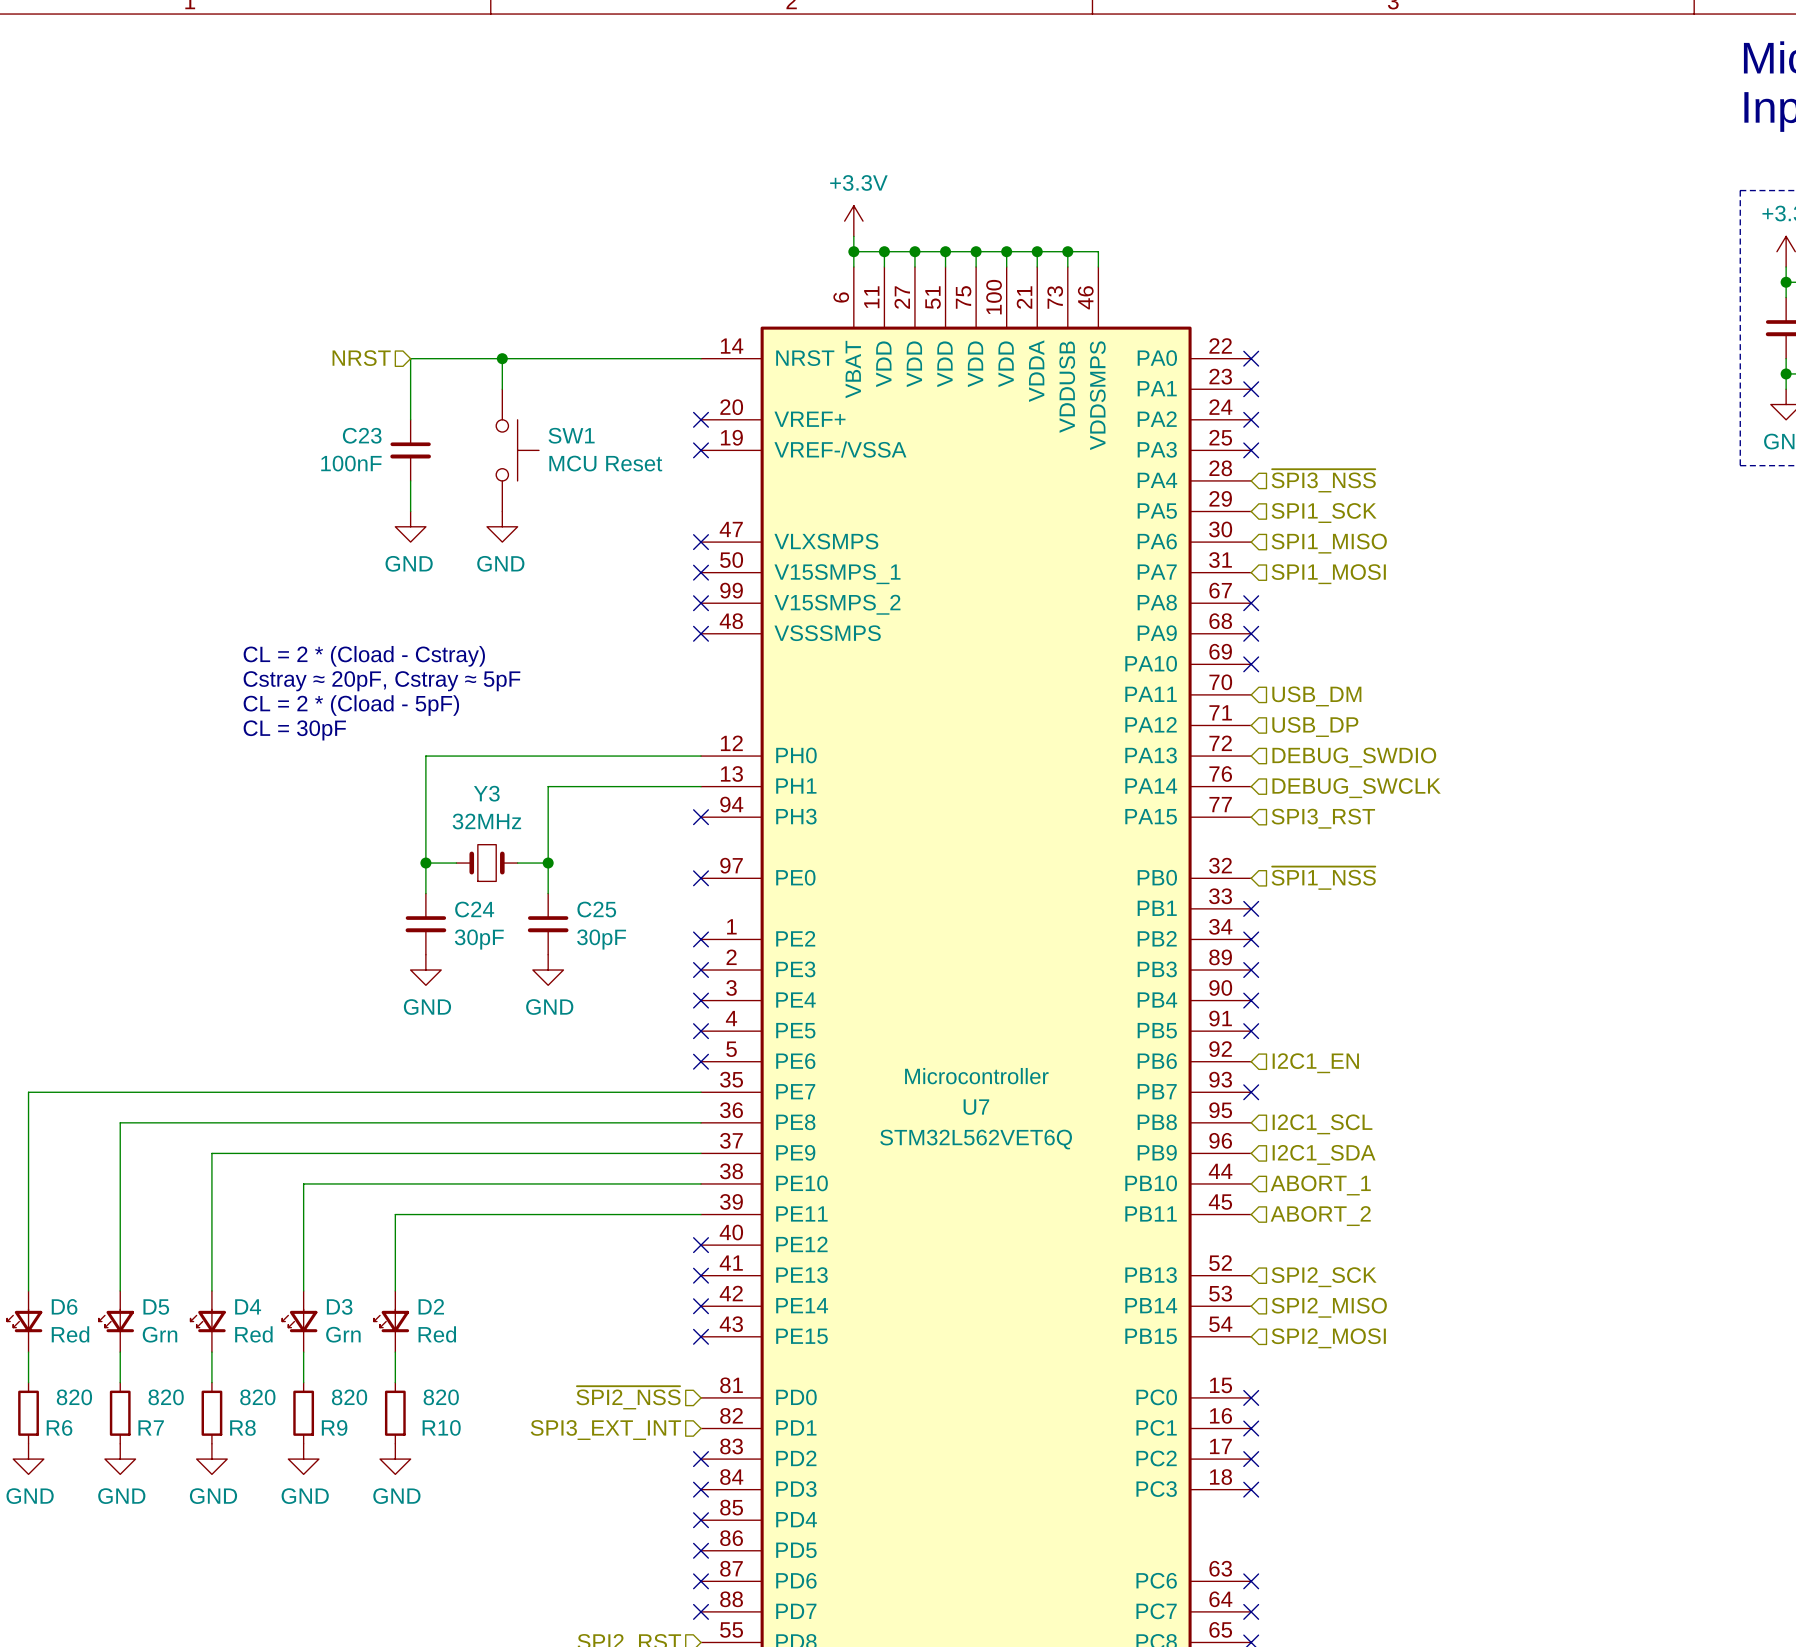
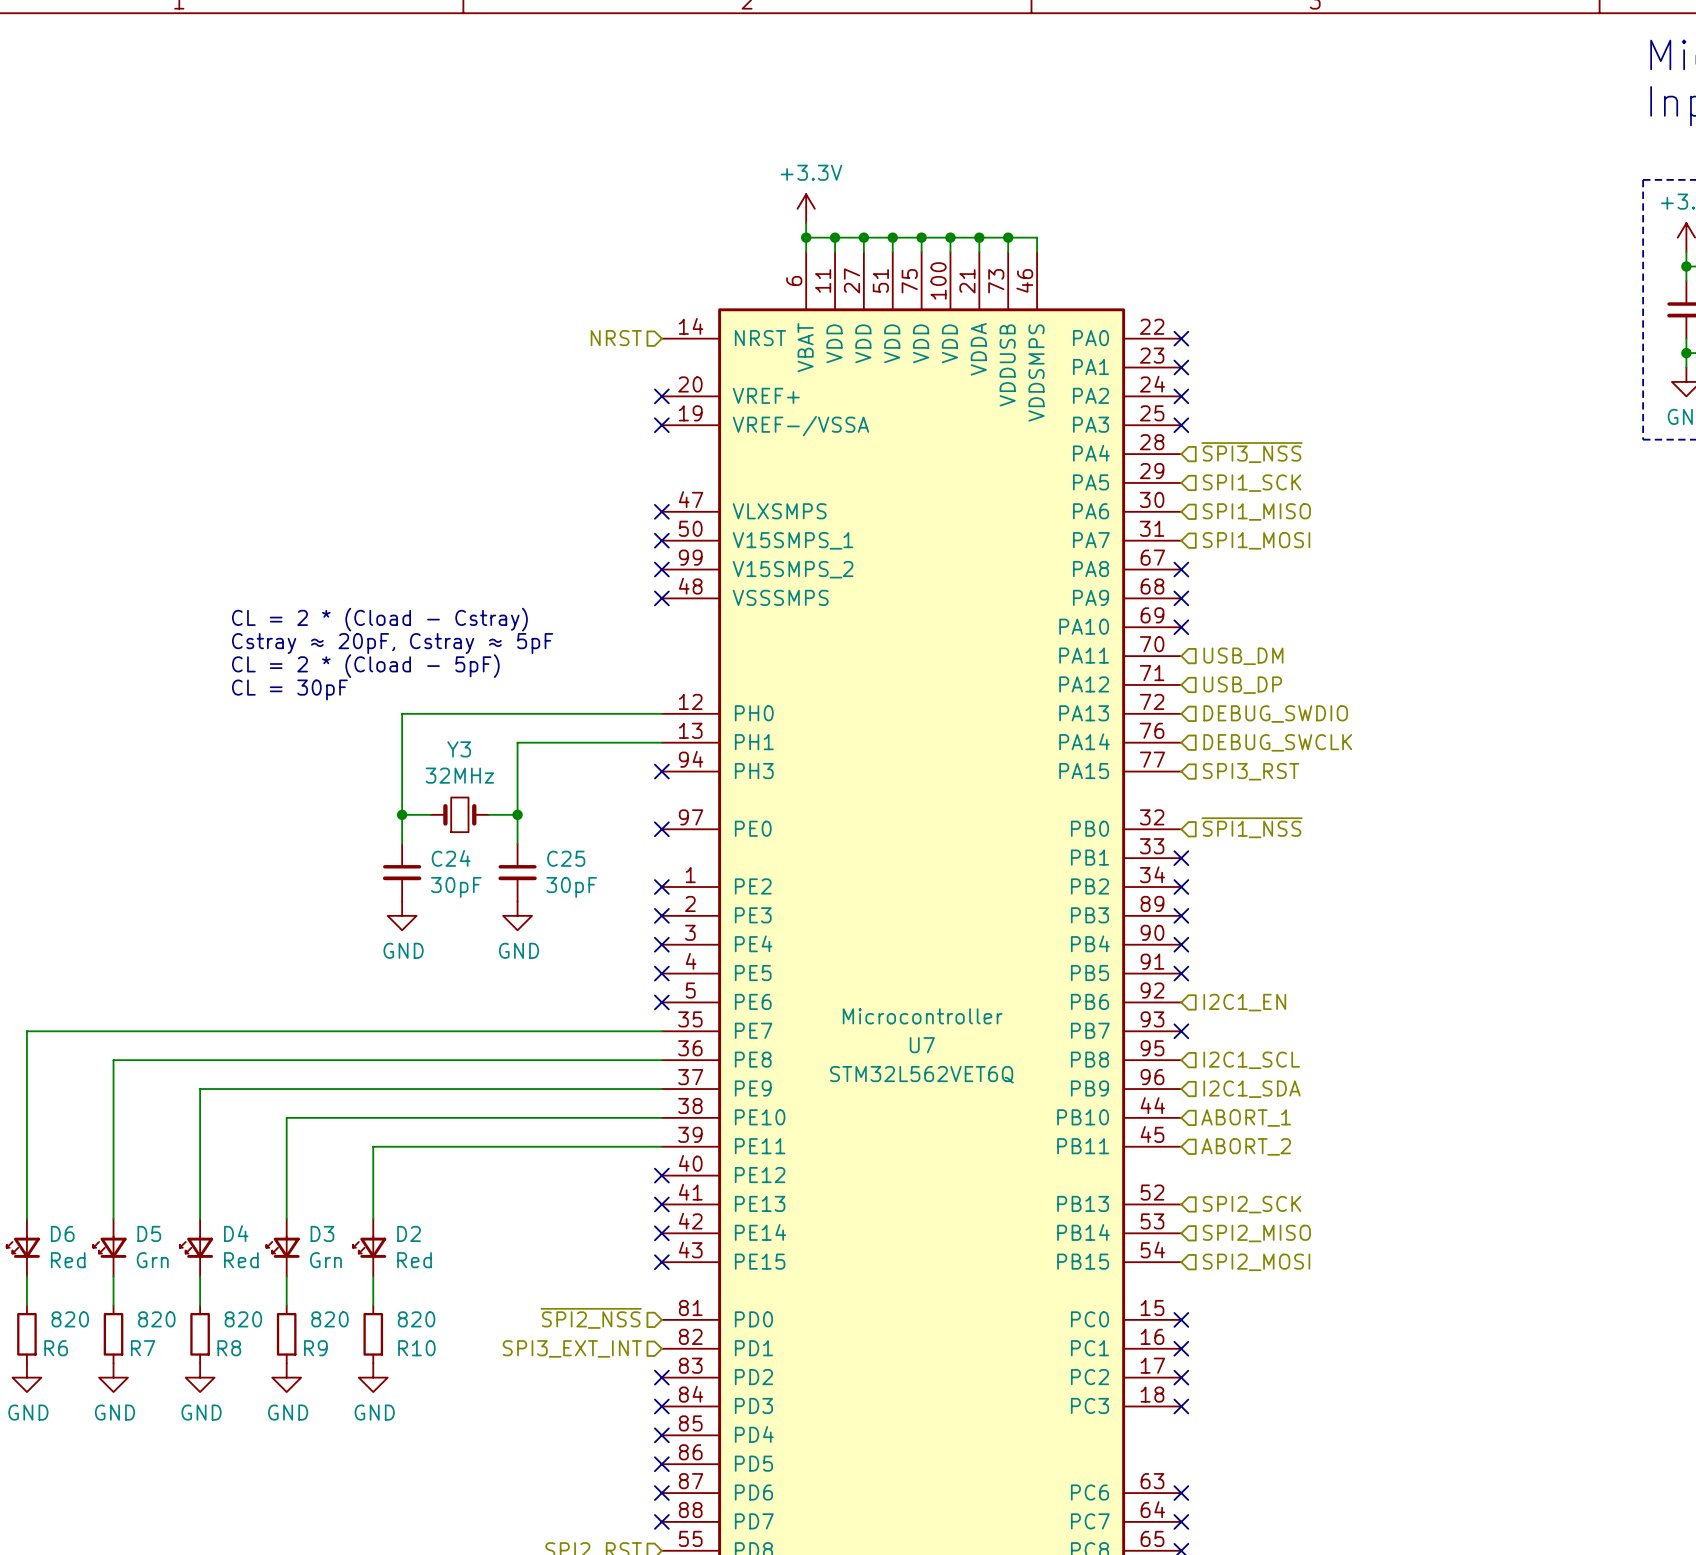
hierarchical label position: NRST (361, 358) -> NRST (616, 338)
wire: (502, 358) (502, 389) -> none
junction: (502, 358) -> none
wire: (701, 358) (410, 358) (410, 419) -> none
C23: 100nF (410, 450) -> none
SW1: MCU Reset (517, 450) -> none
wire: (410, 480) (410, 511) -> none
power symbol: GND (410, 526) -> none
power symbol: GND (502, 526) -> none

